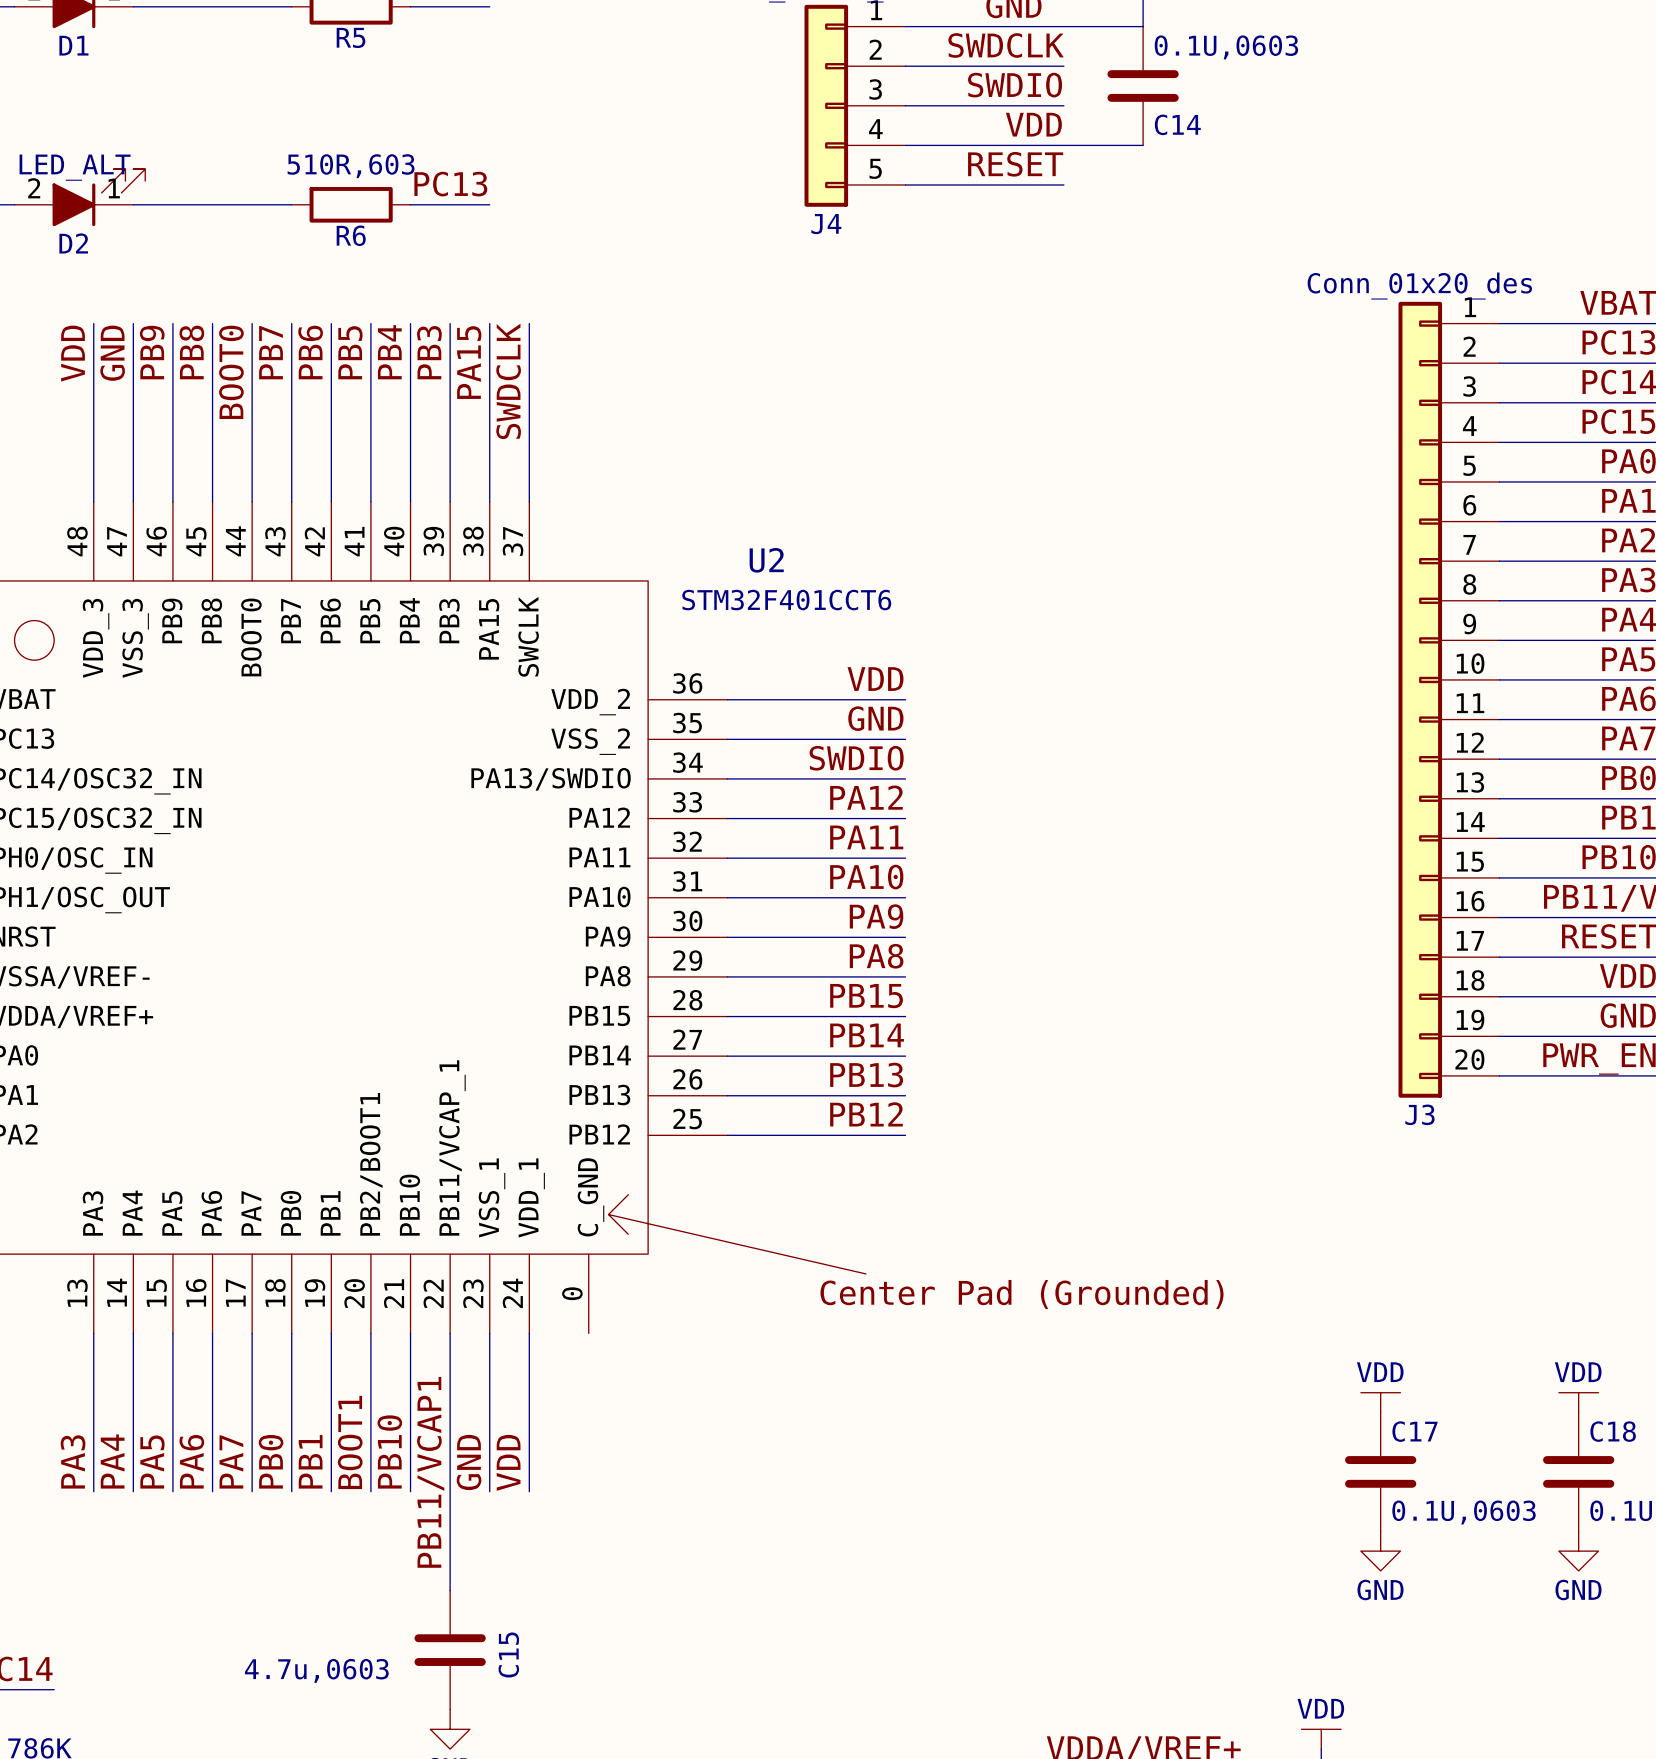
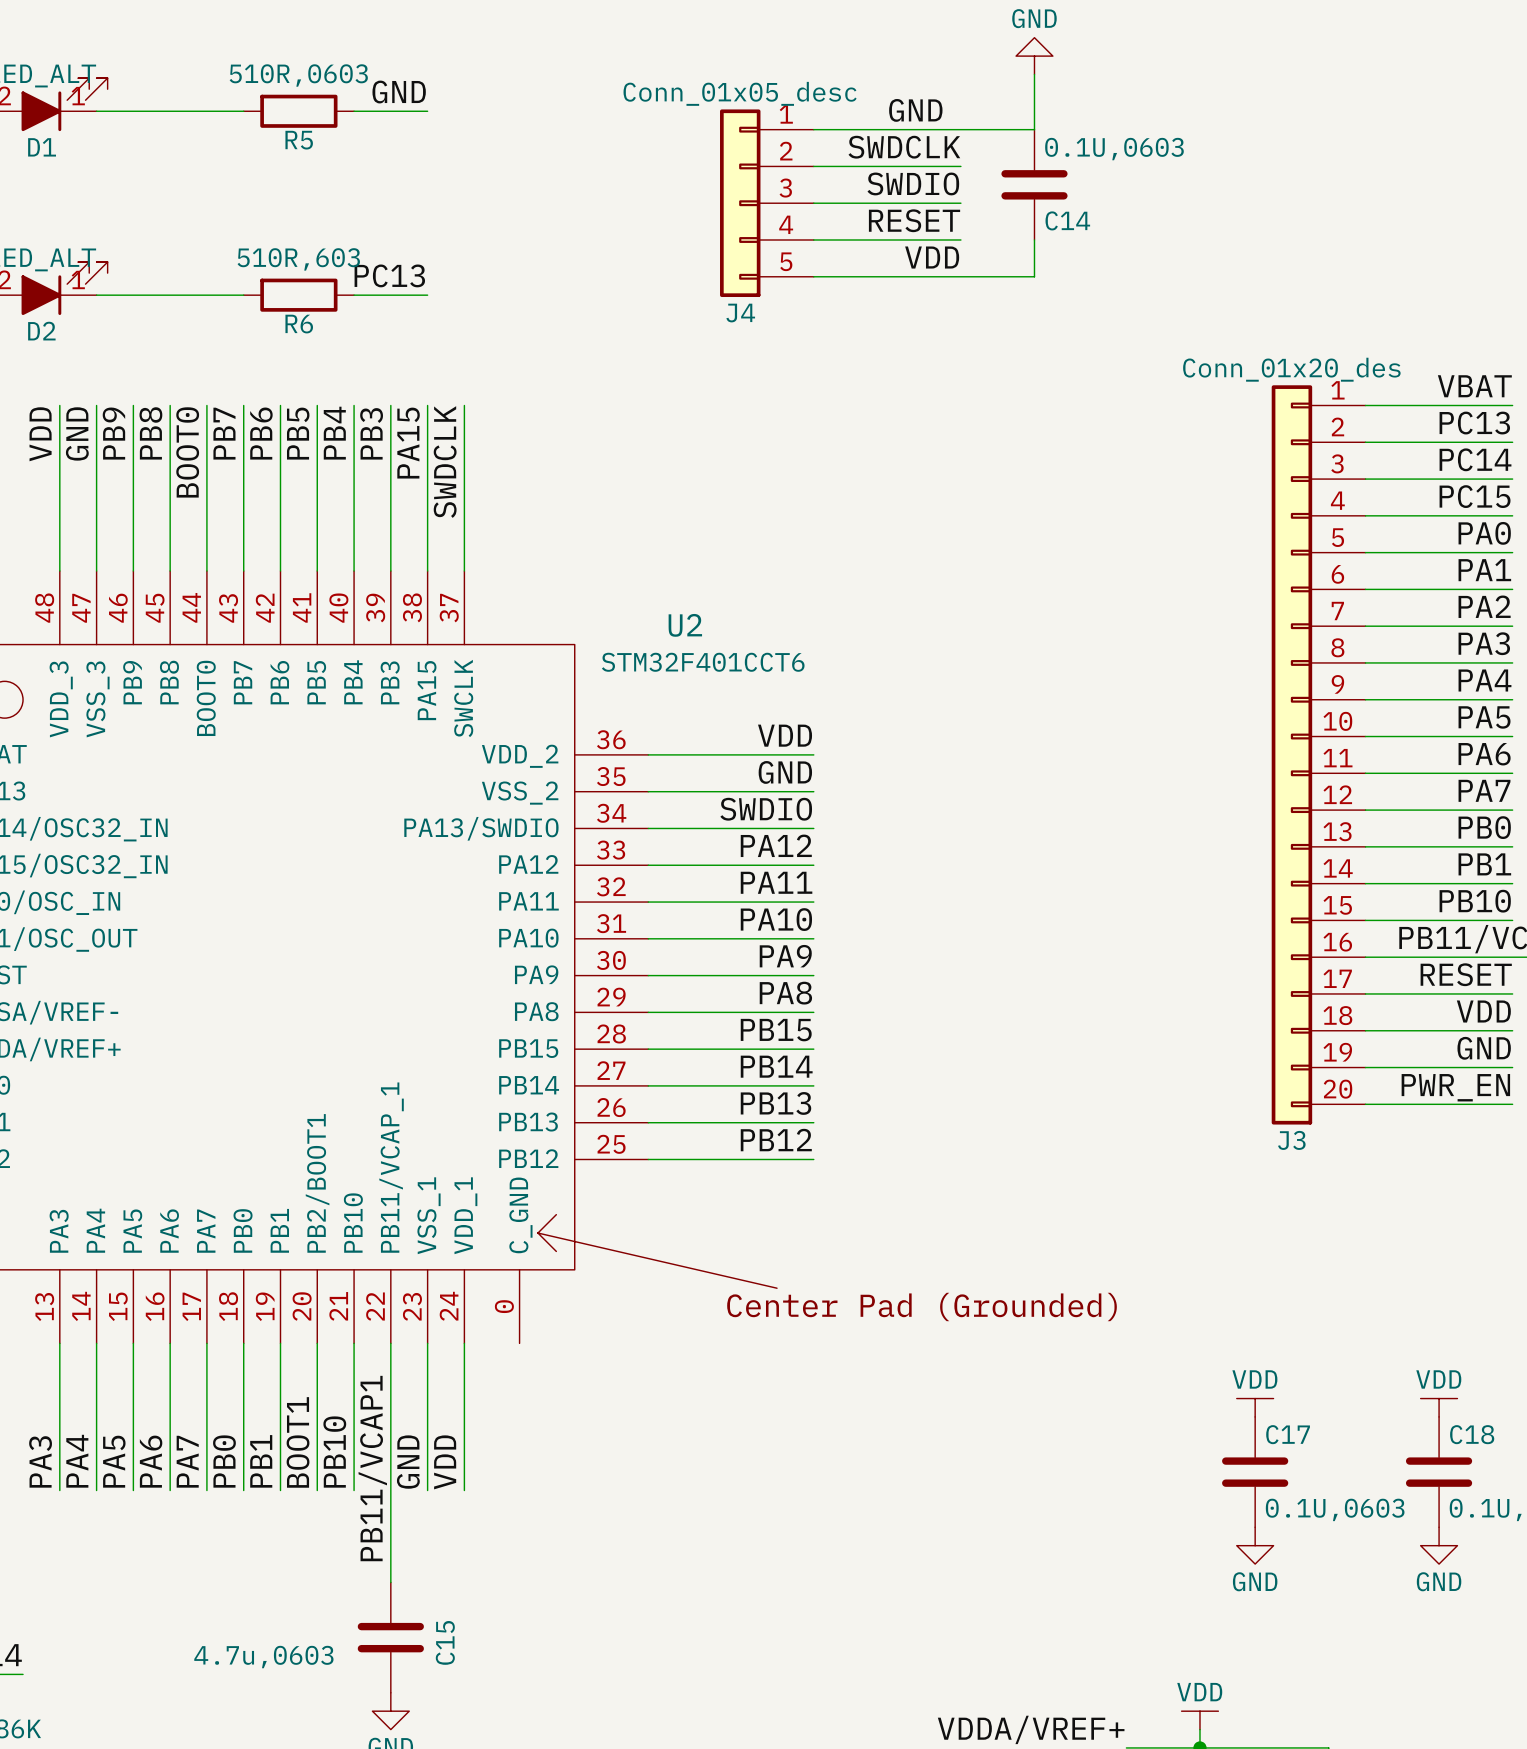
label: VDD (1033, 124) -> RESET (914, 220)
wire: (1063, 145) (1143, 145) -> (960, 276) (1034, 276) (1034, 239)
label: RESET (1015, 164) -> VDD (932, 257)

